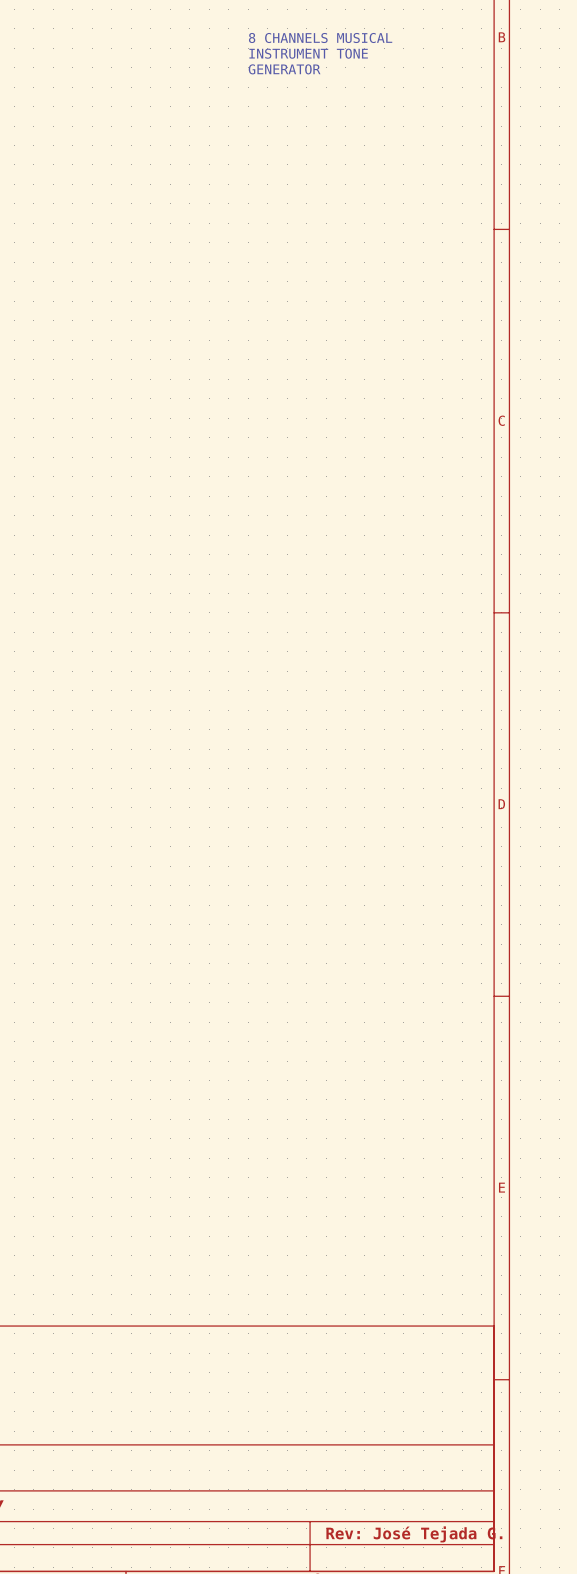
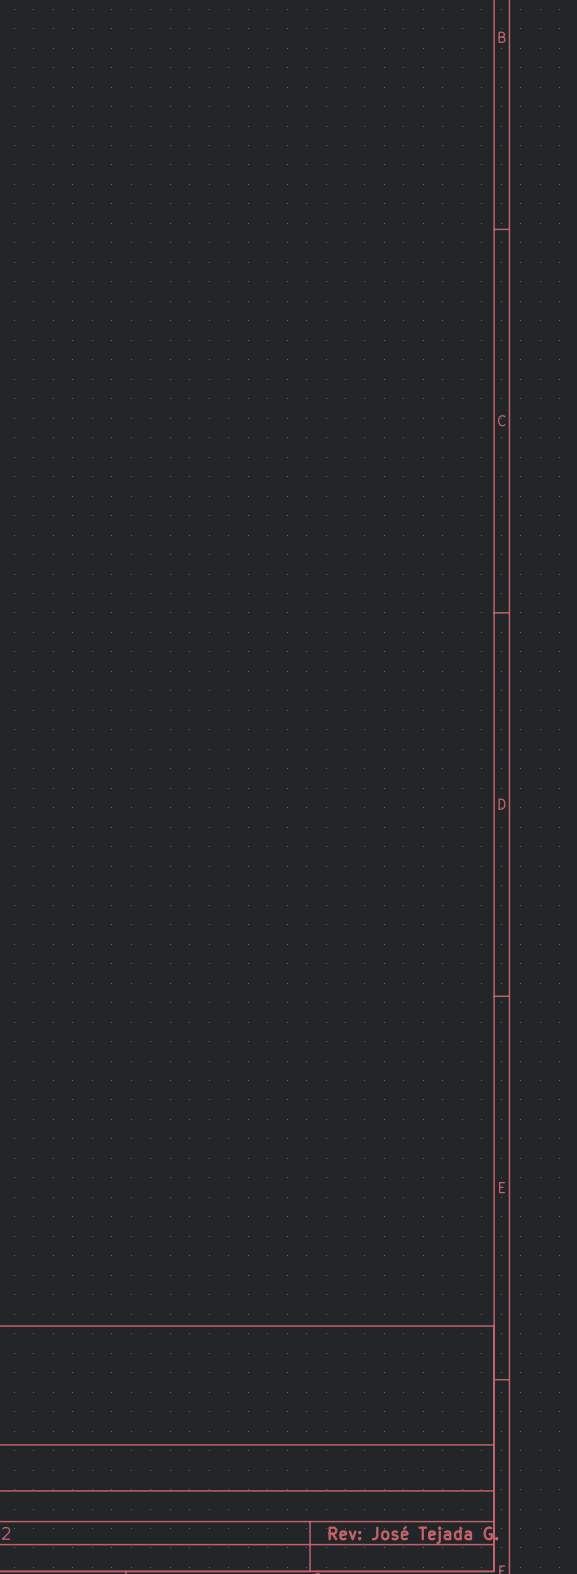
text: 8 CHANNELS MUSICAL (320, 37) -> none
text: INSTRUMENT TONE (308, 53) -> none
text: GENERATOR (284, 69) -> none

